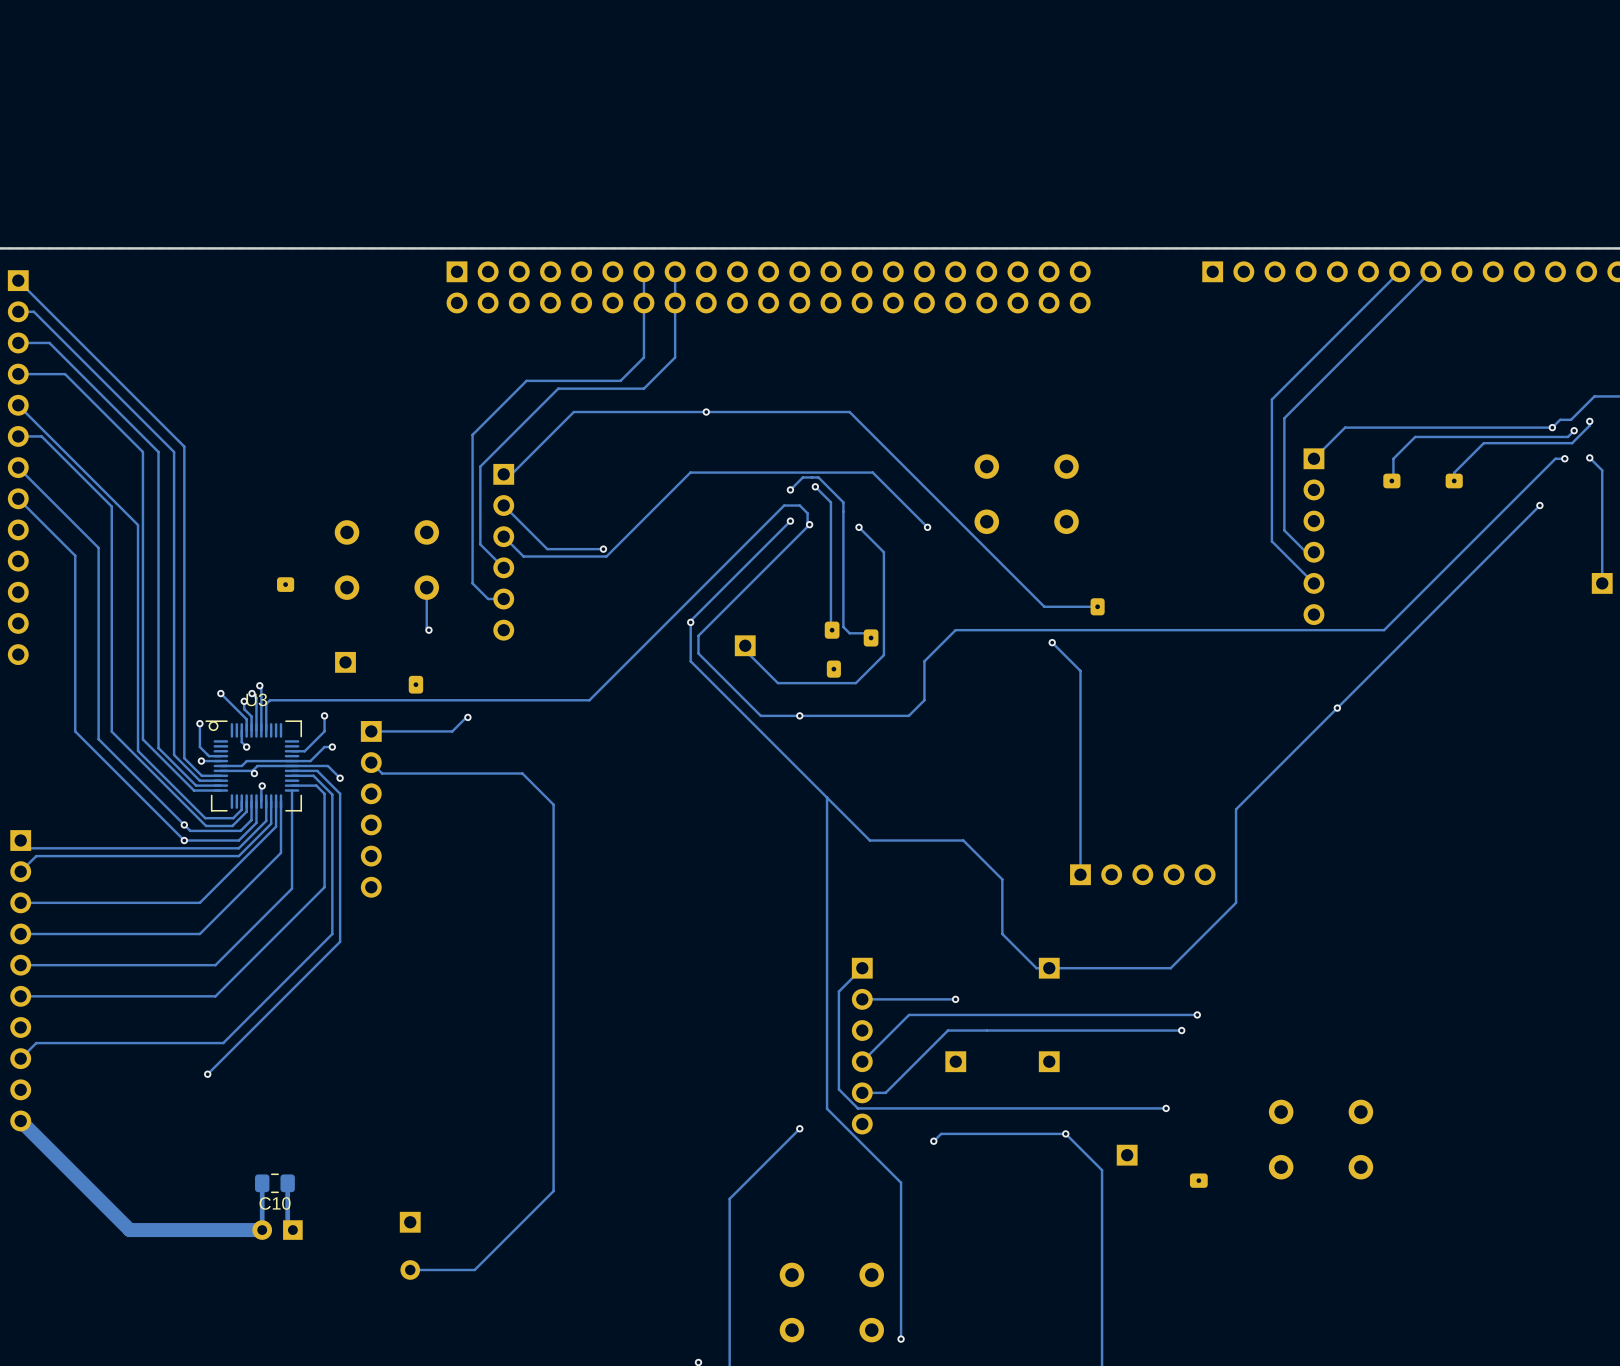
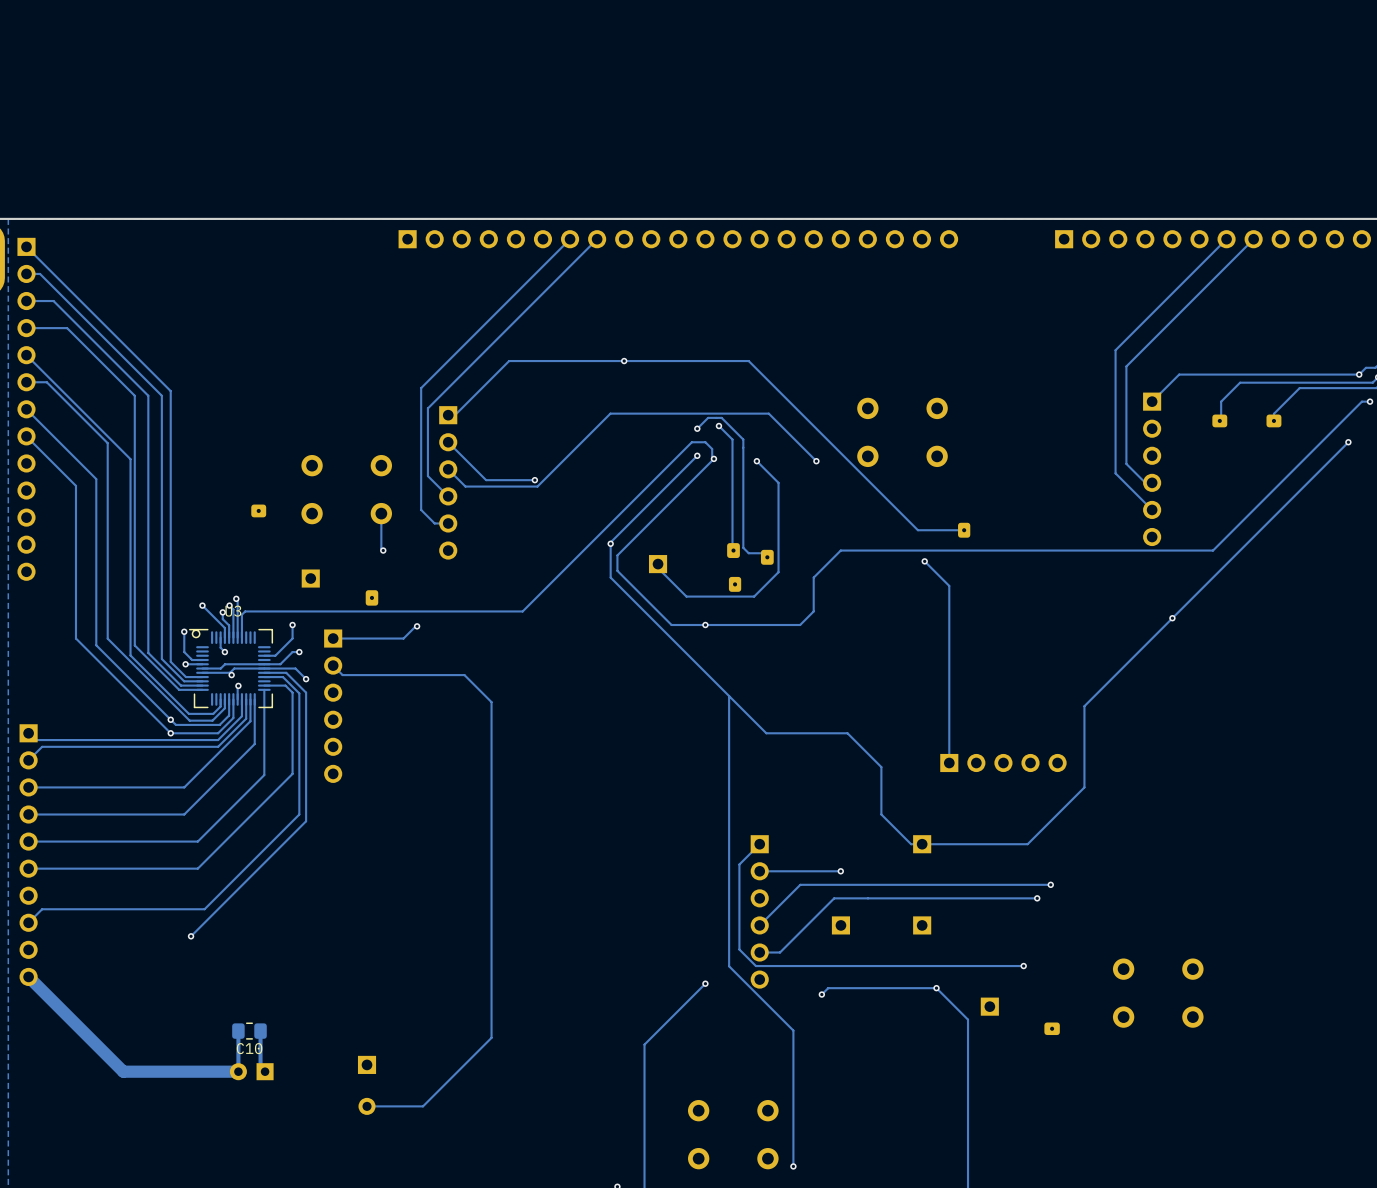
track: (643, 271) (643, 357) (620, 380) (526, 380) (472, 434) (472, 443) -> (570, 239) (421, 388)
track: (675, 271) (675, 357) (643, 388) (558, 388) -> (597, 239) (495, 340)
part: none -> (678, 239)
part: (768, 287) -> none

